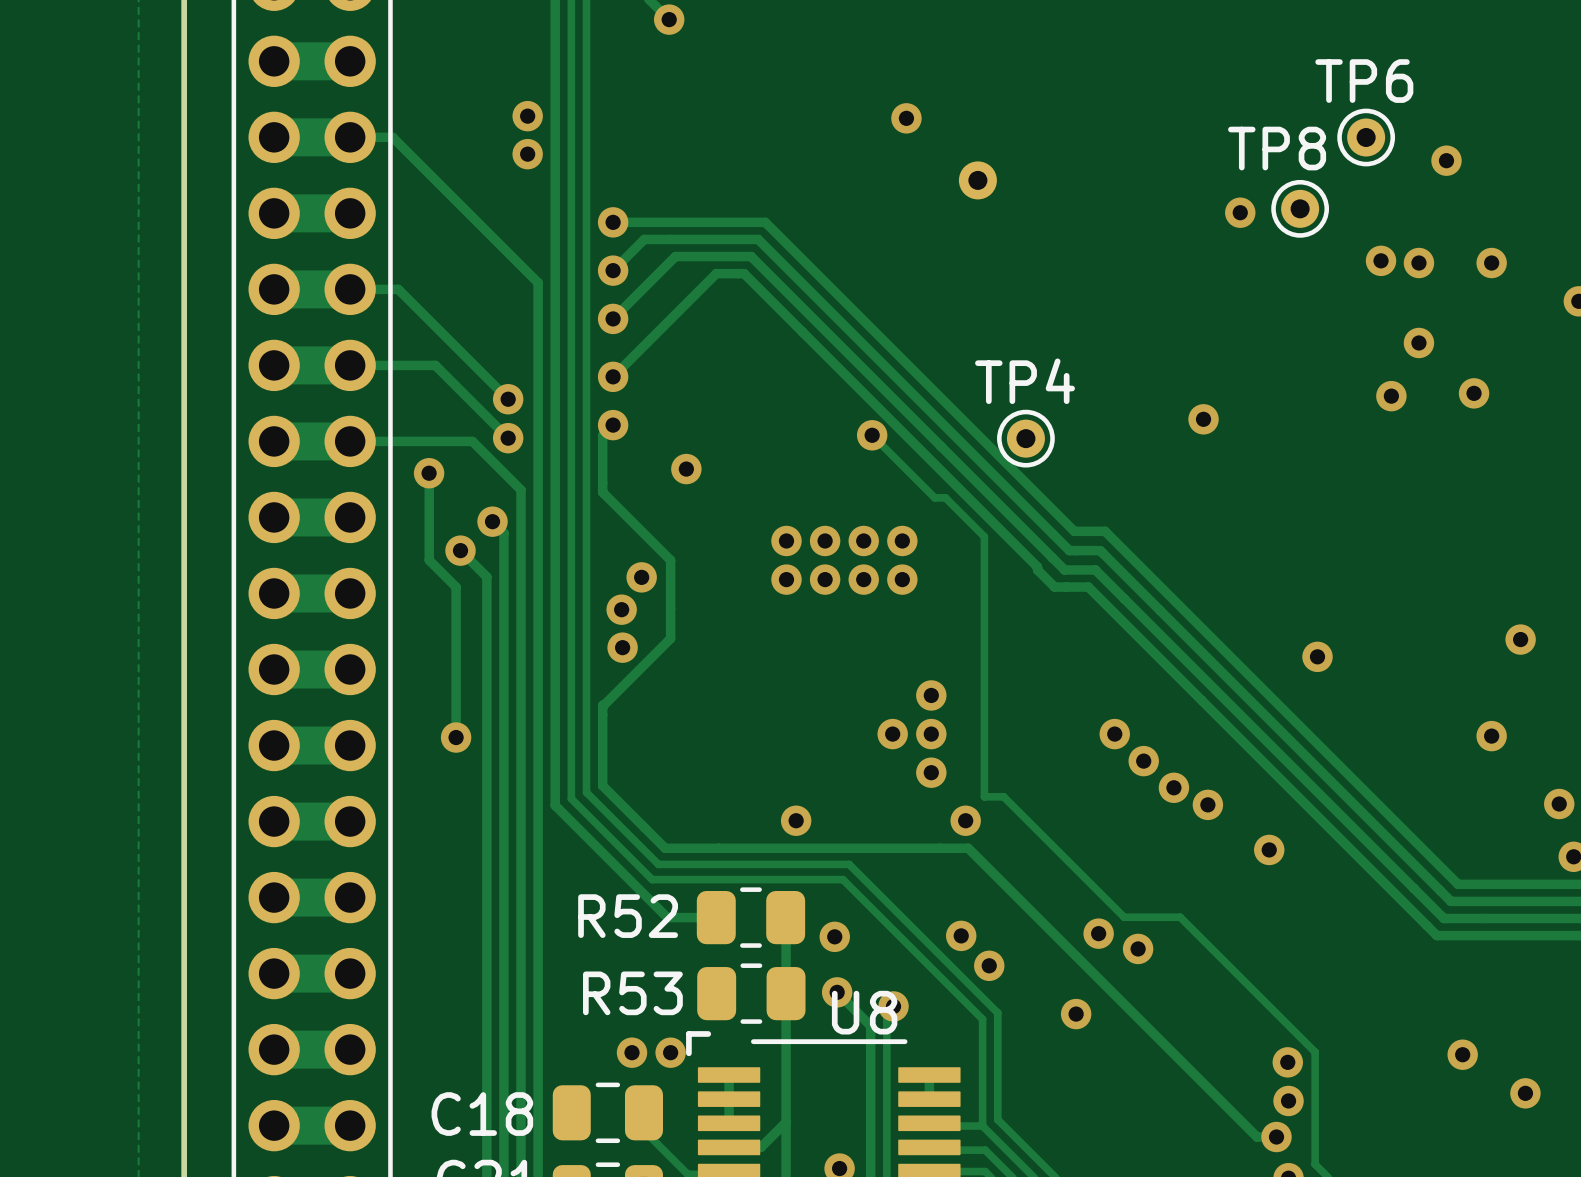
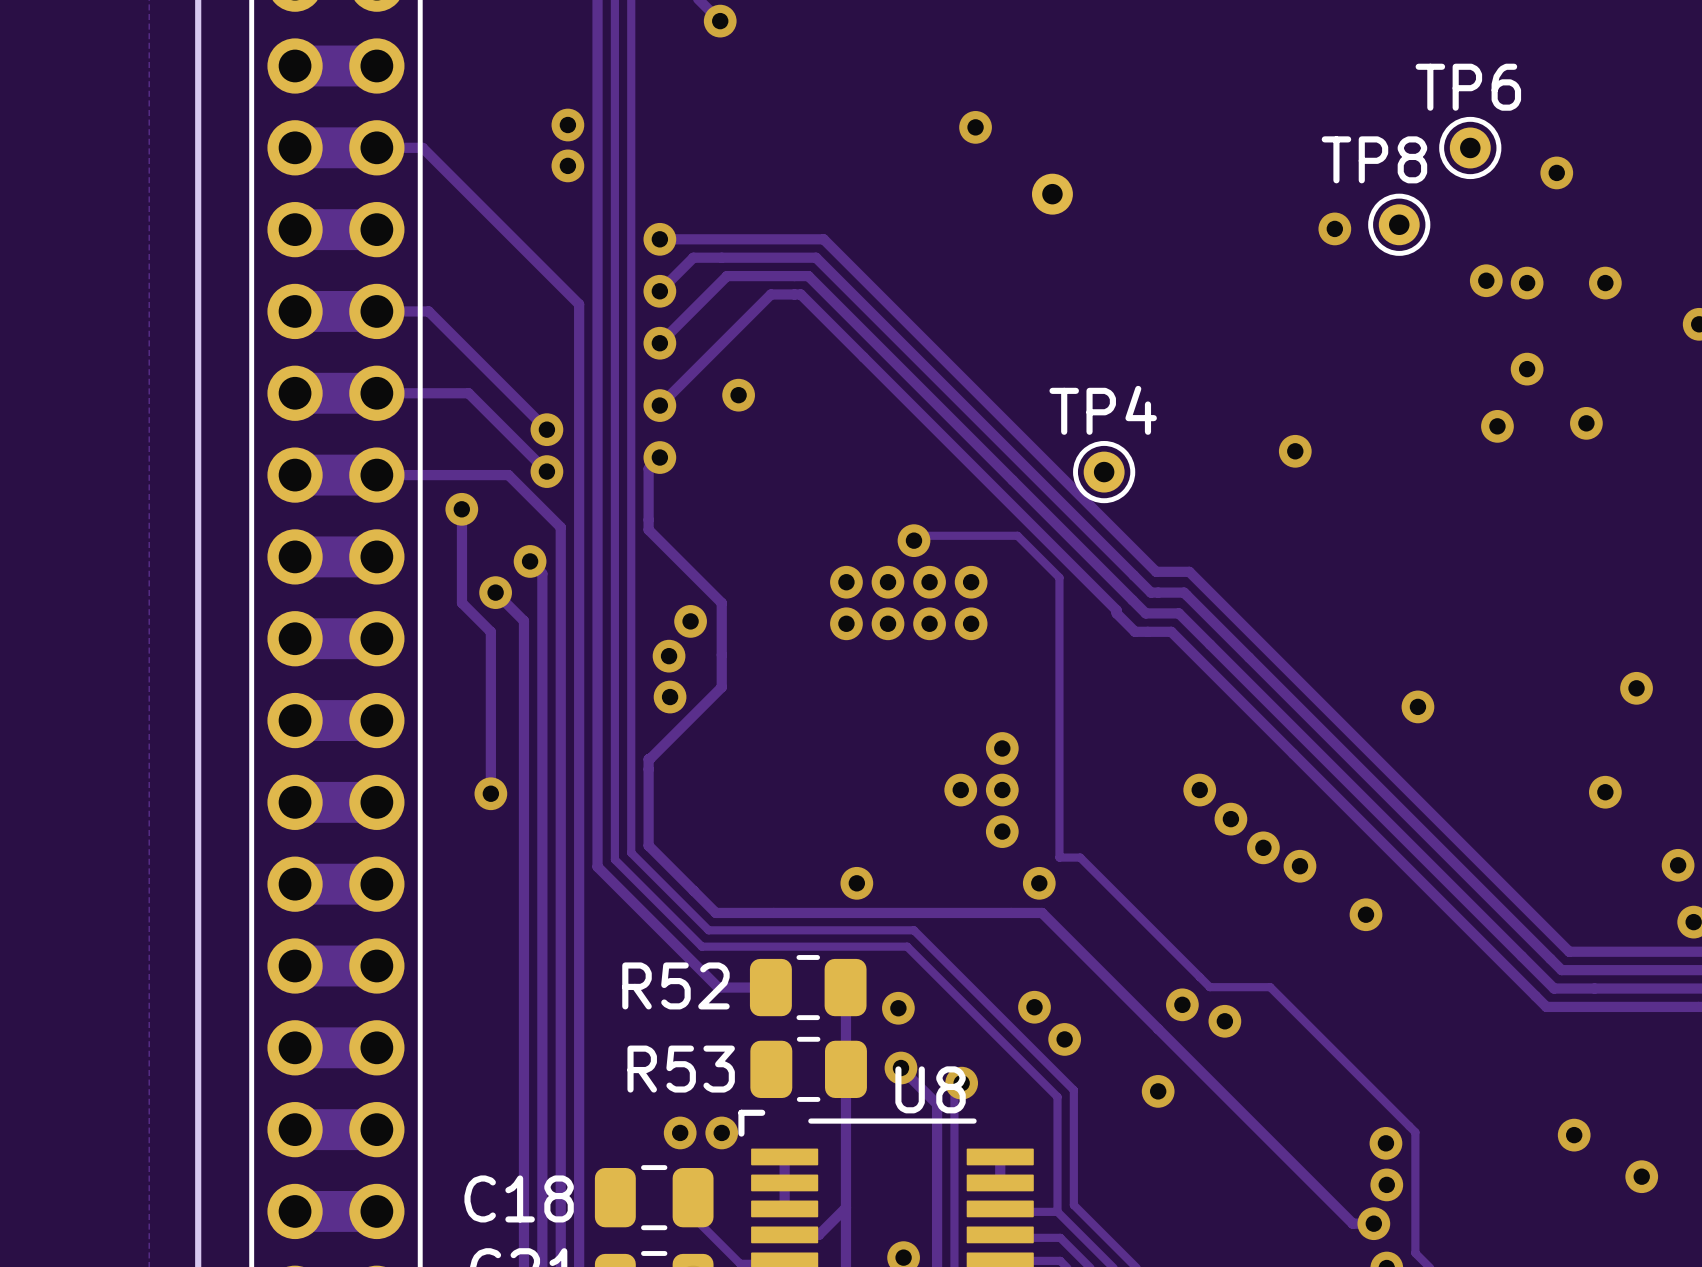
via: none -> (738, 395)
track: (872, 435) (934, 497) -> (913, 540) (918, 535) (1005, 535)
via position: (872, 435) -> (913, 540)
via: (686, 469) -> none

